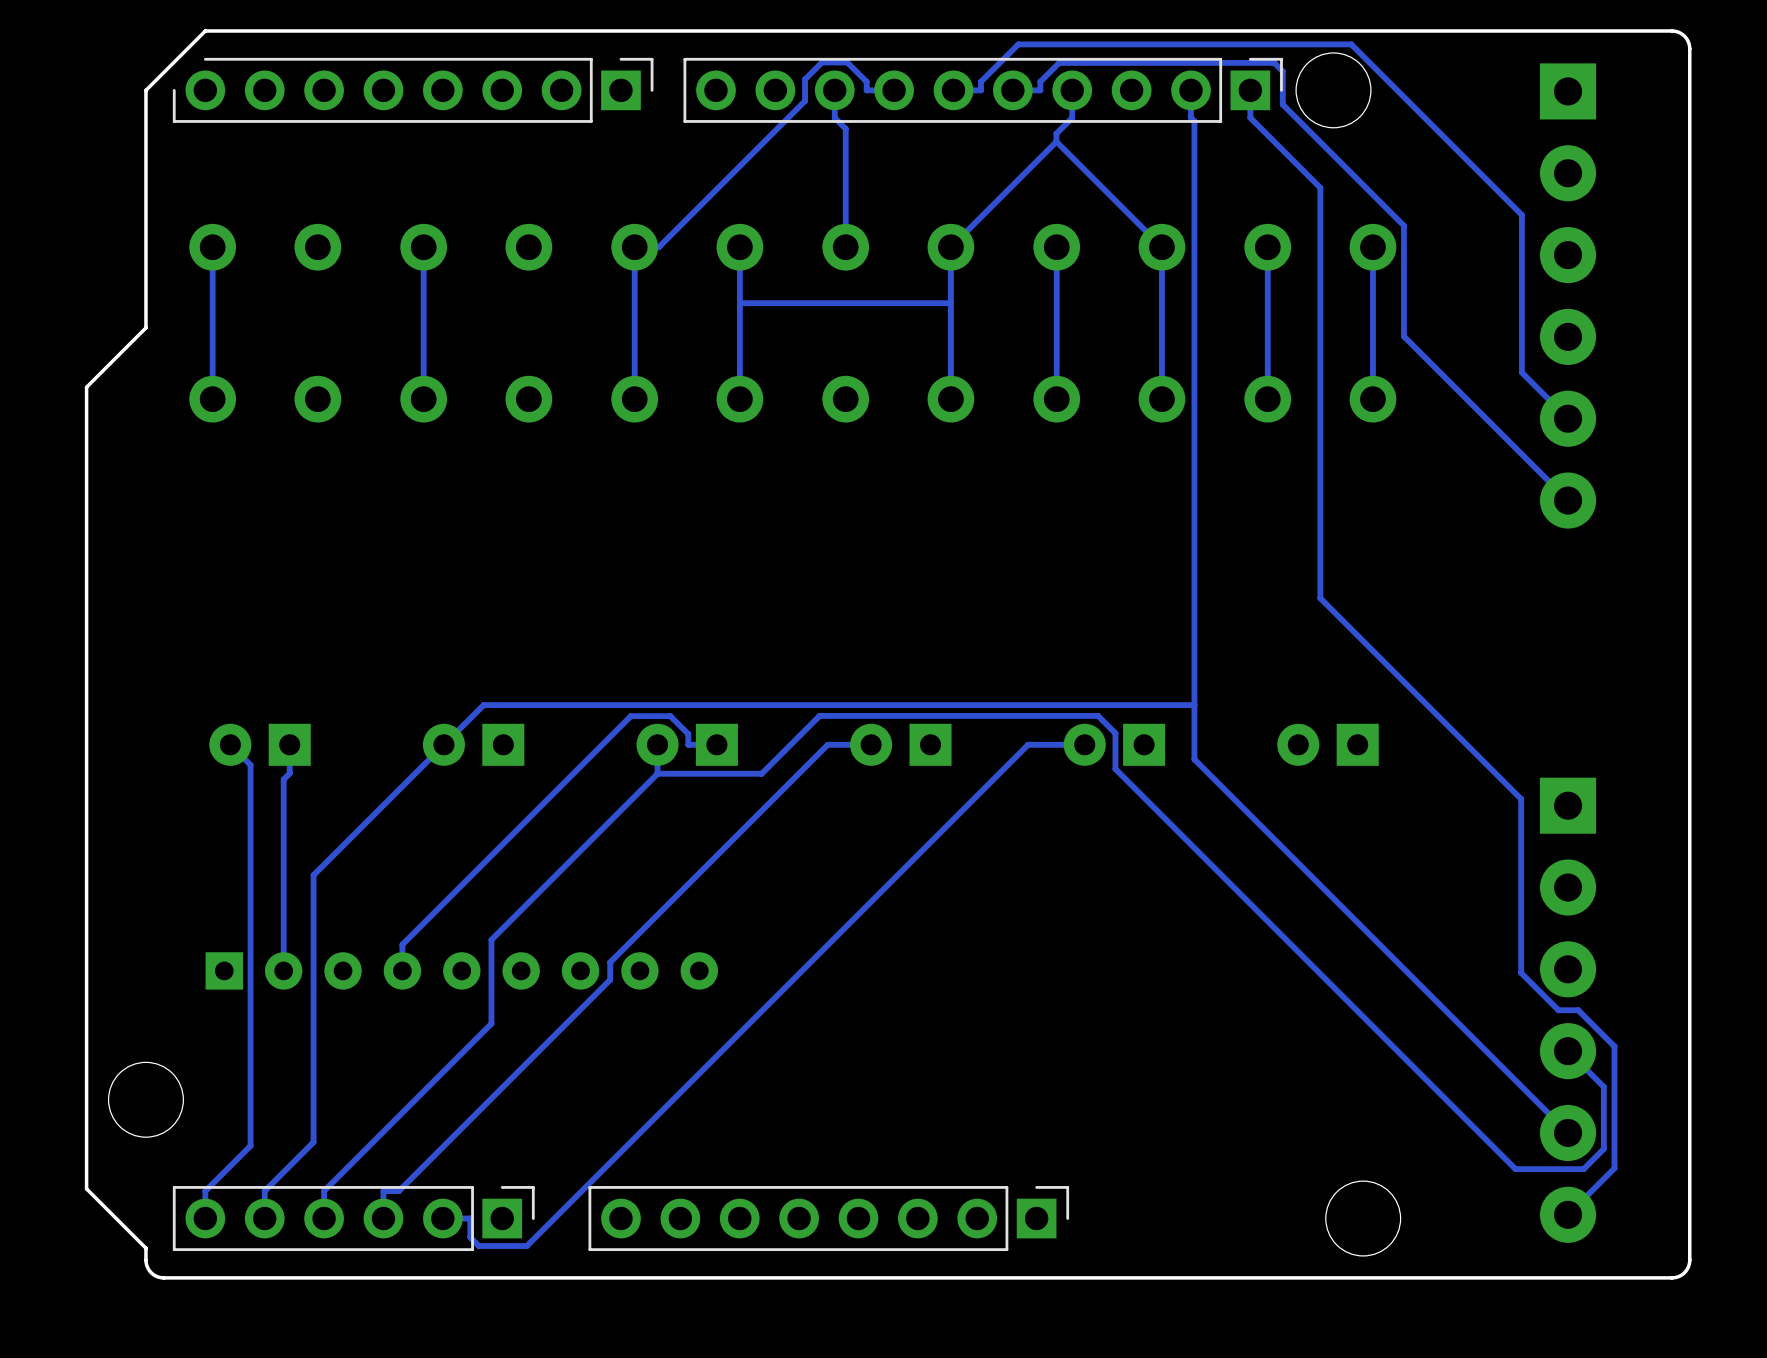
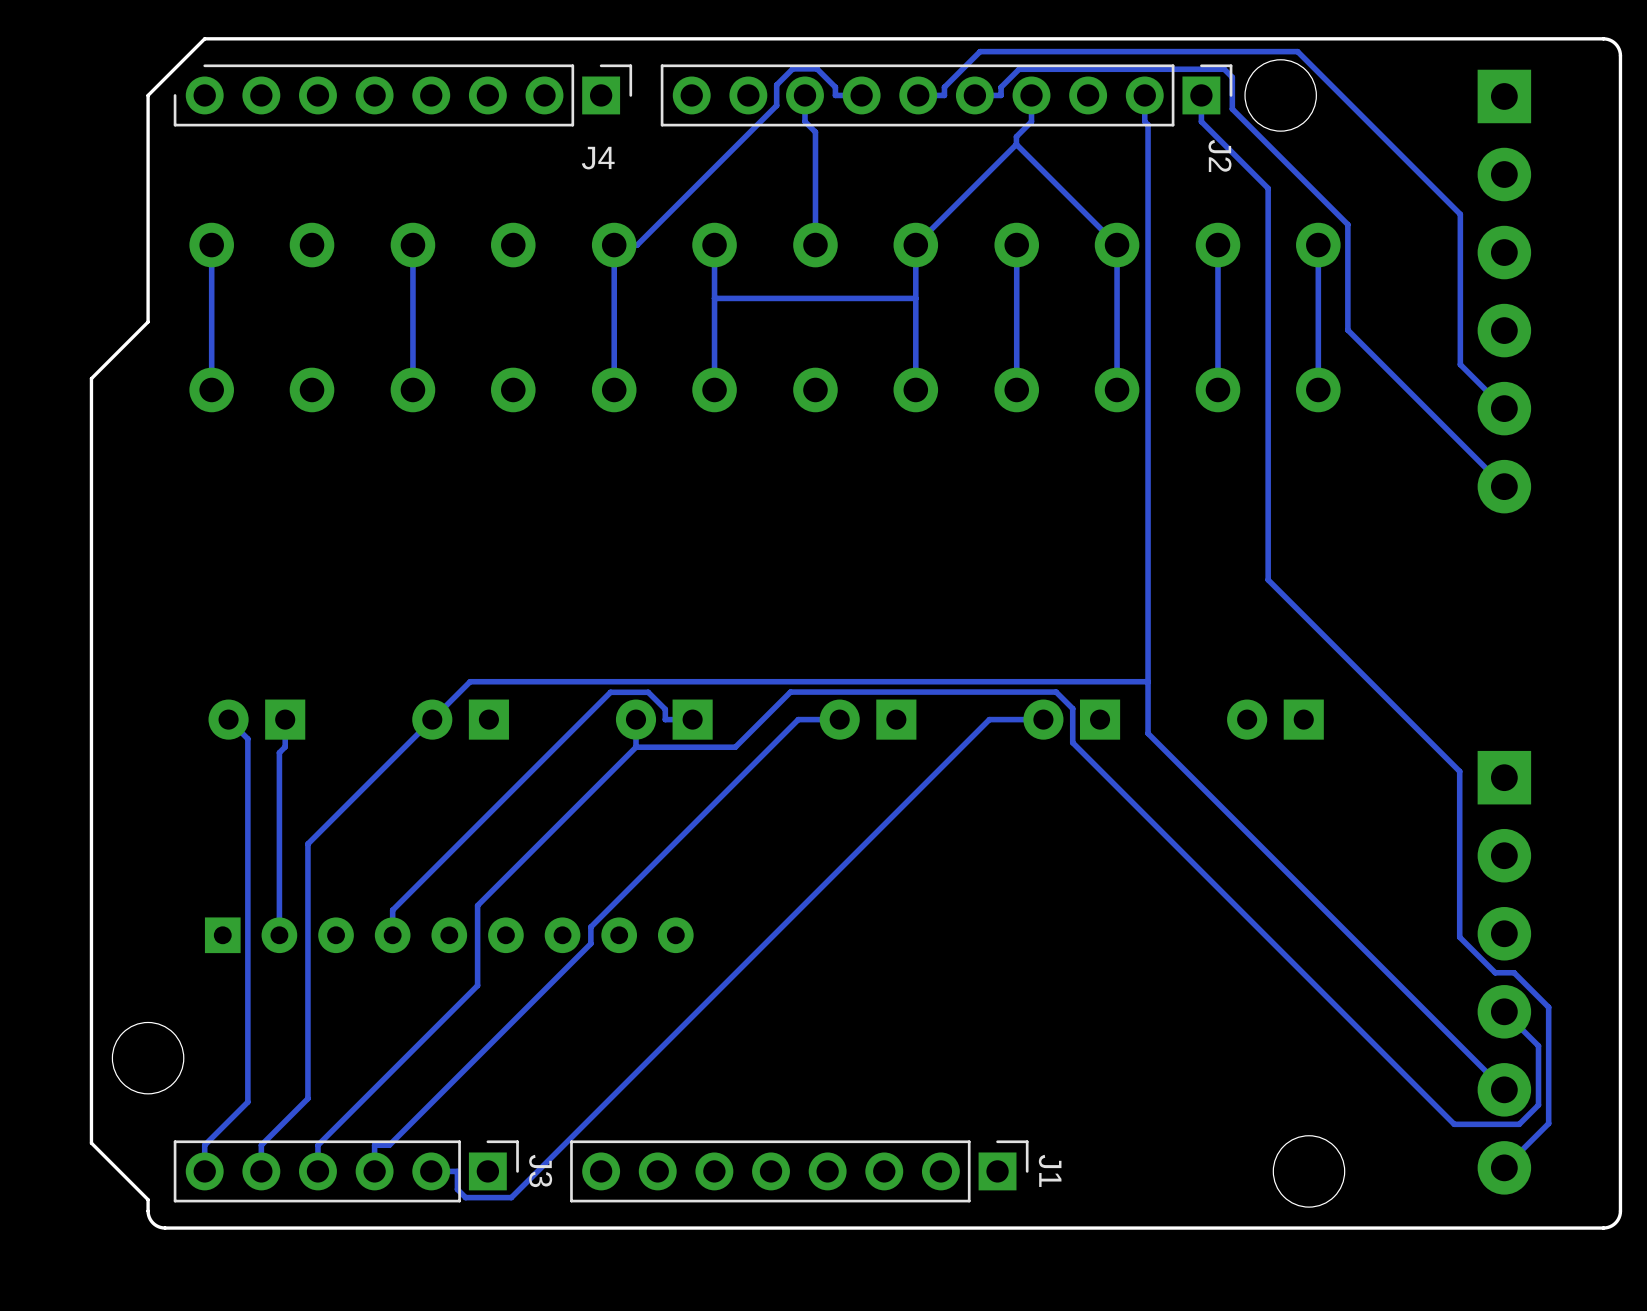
J2 name: none -> J2 (1219, 155)
J4 name: none -> J4 (598, 158)
J1 name: none -> J1 (1050, 1170)
J3 name: none -> J3 (540, 1170)

